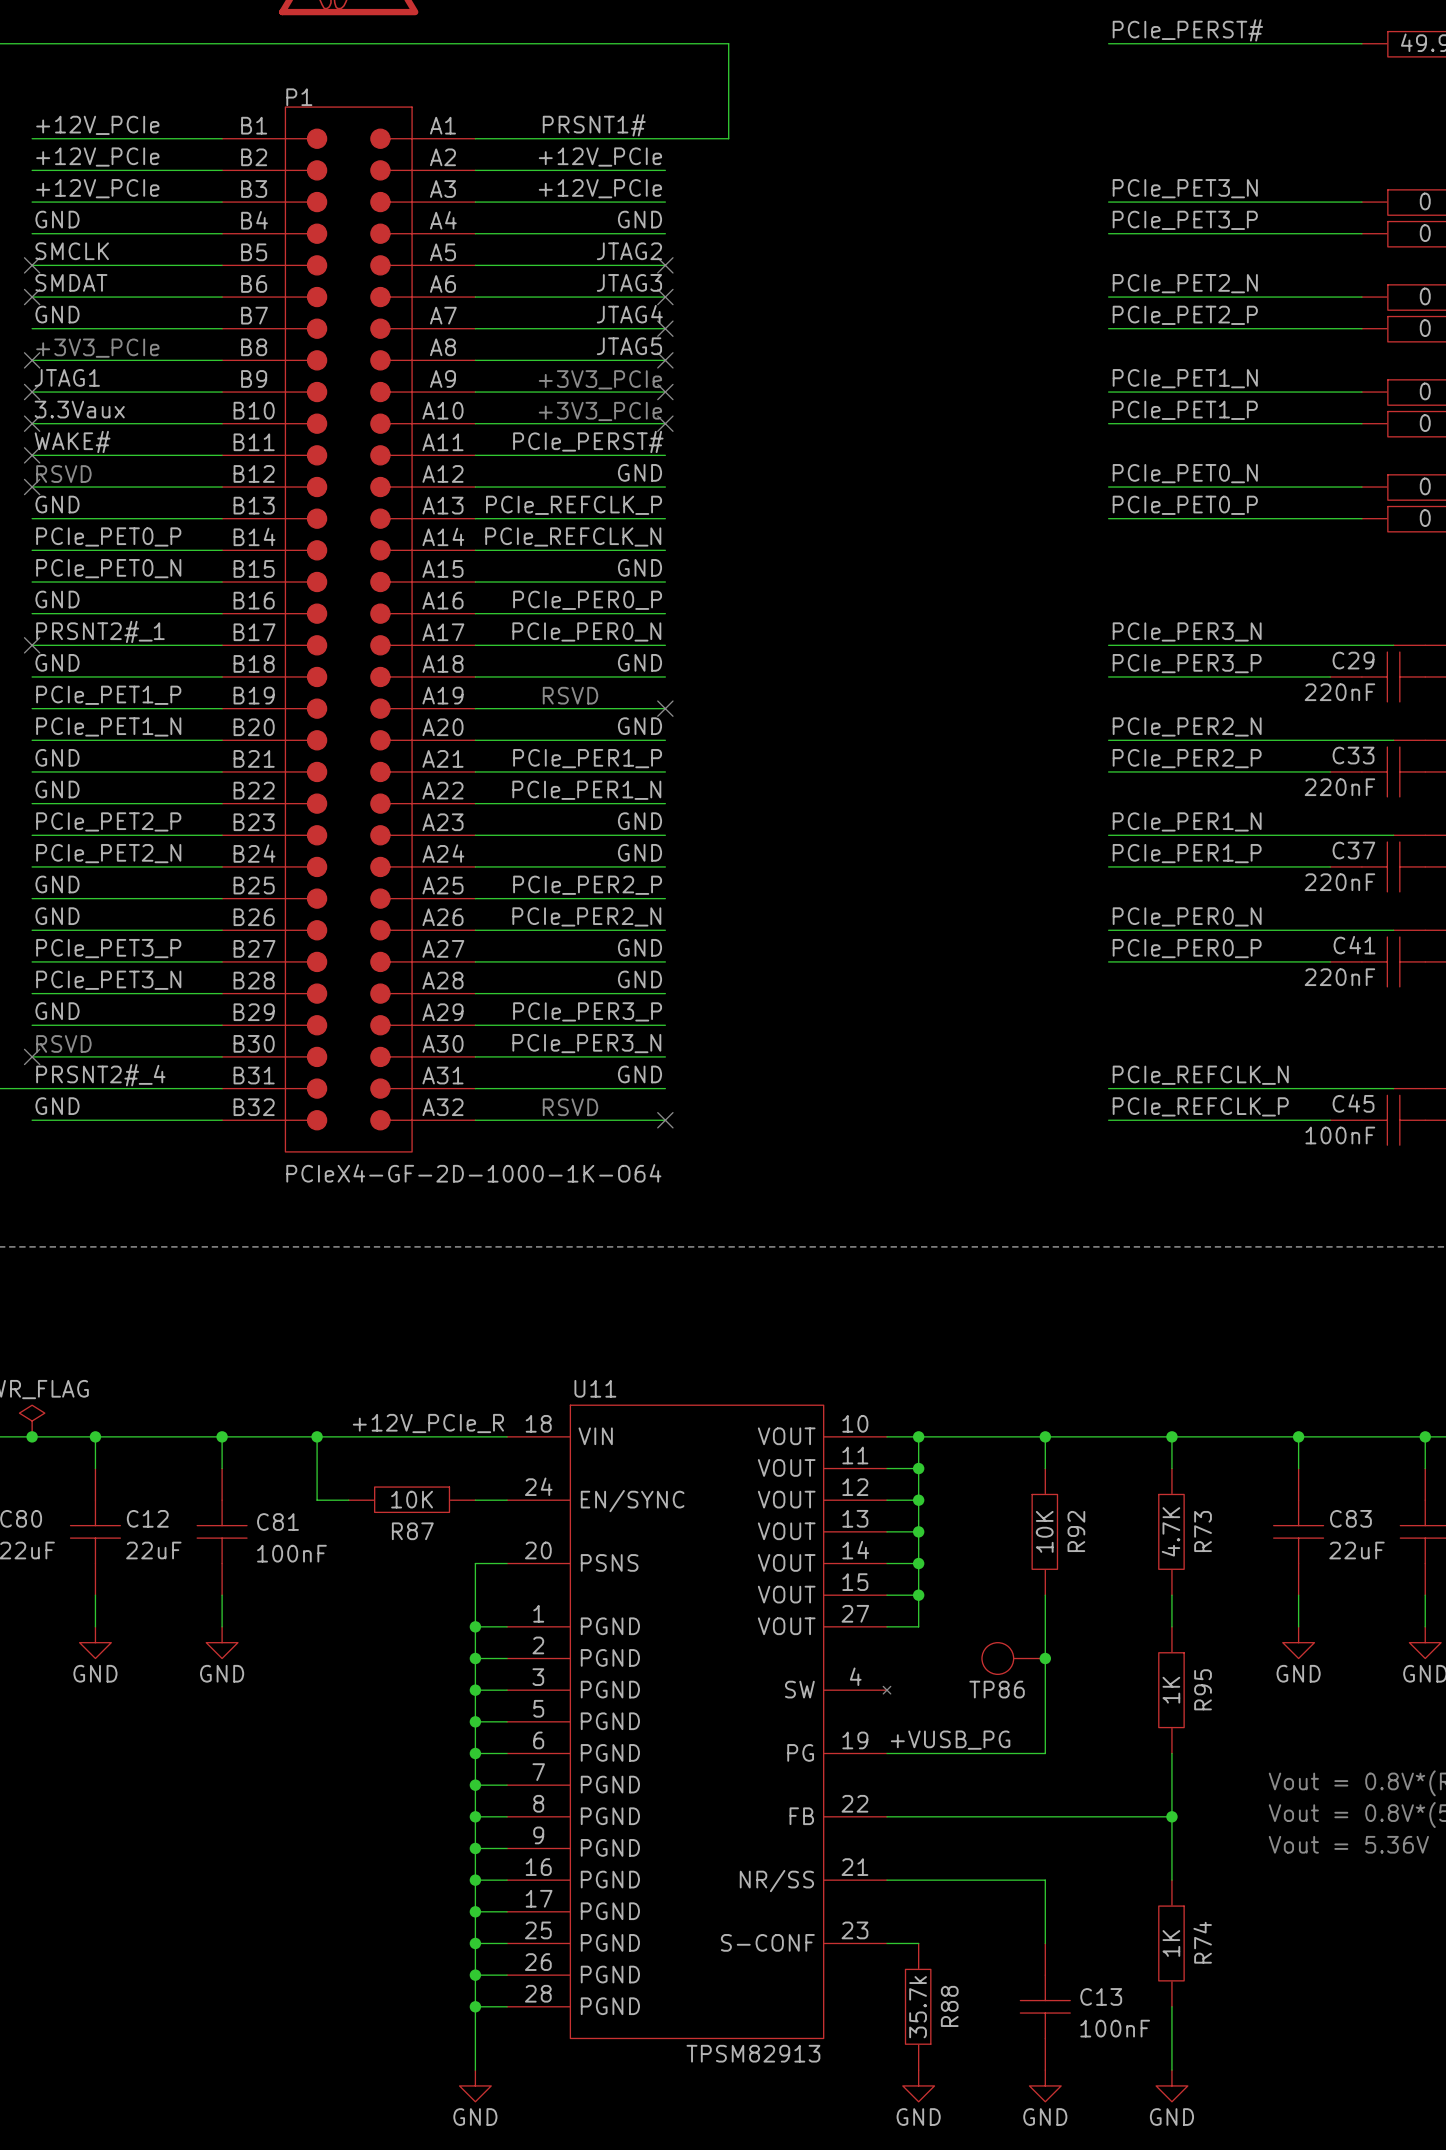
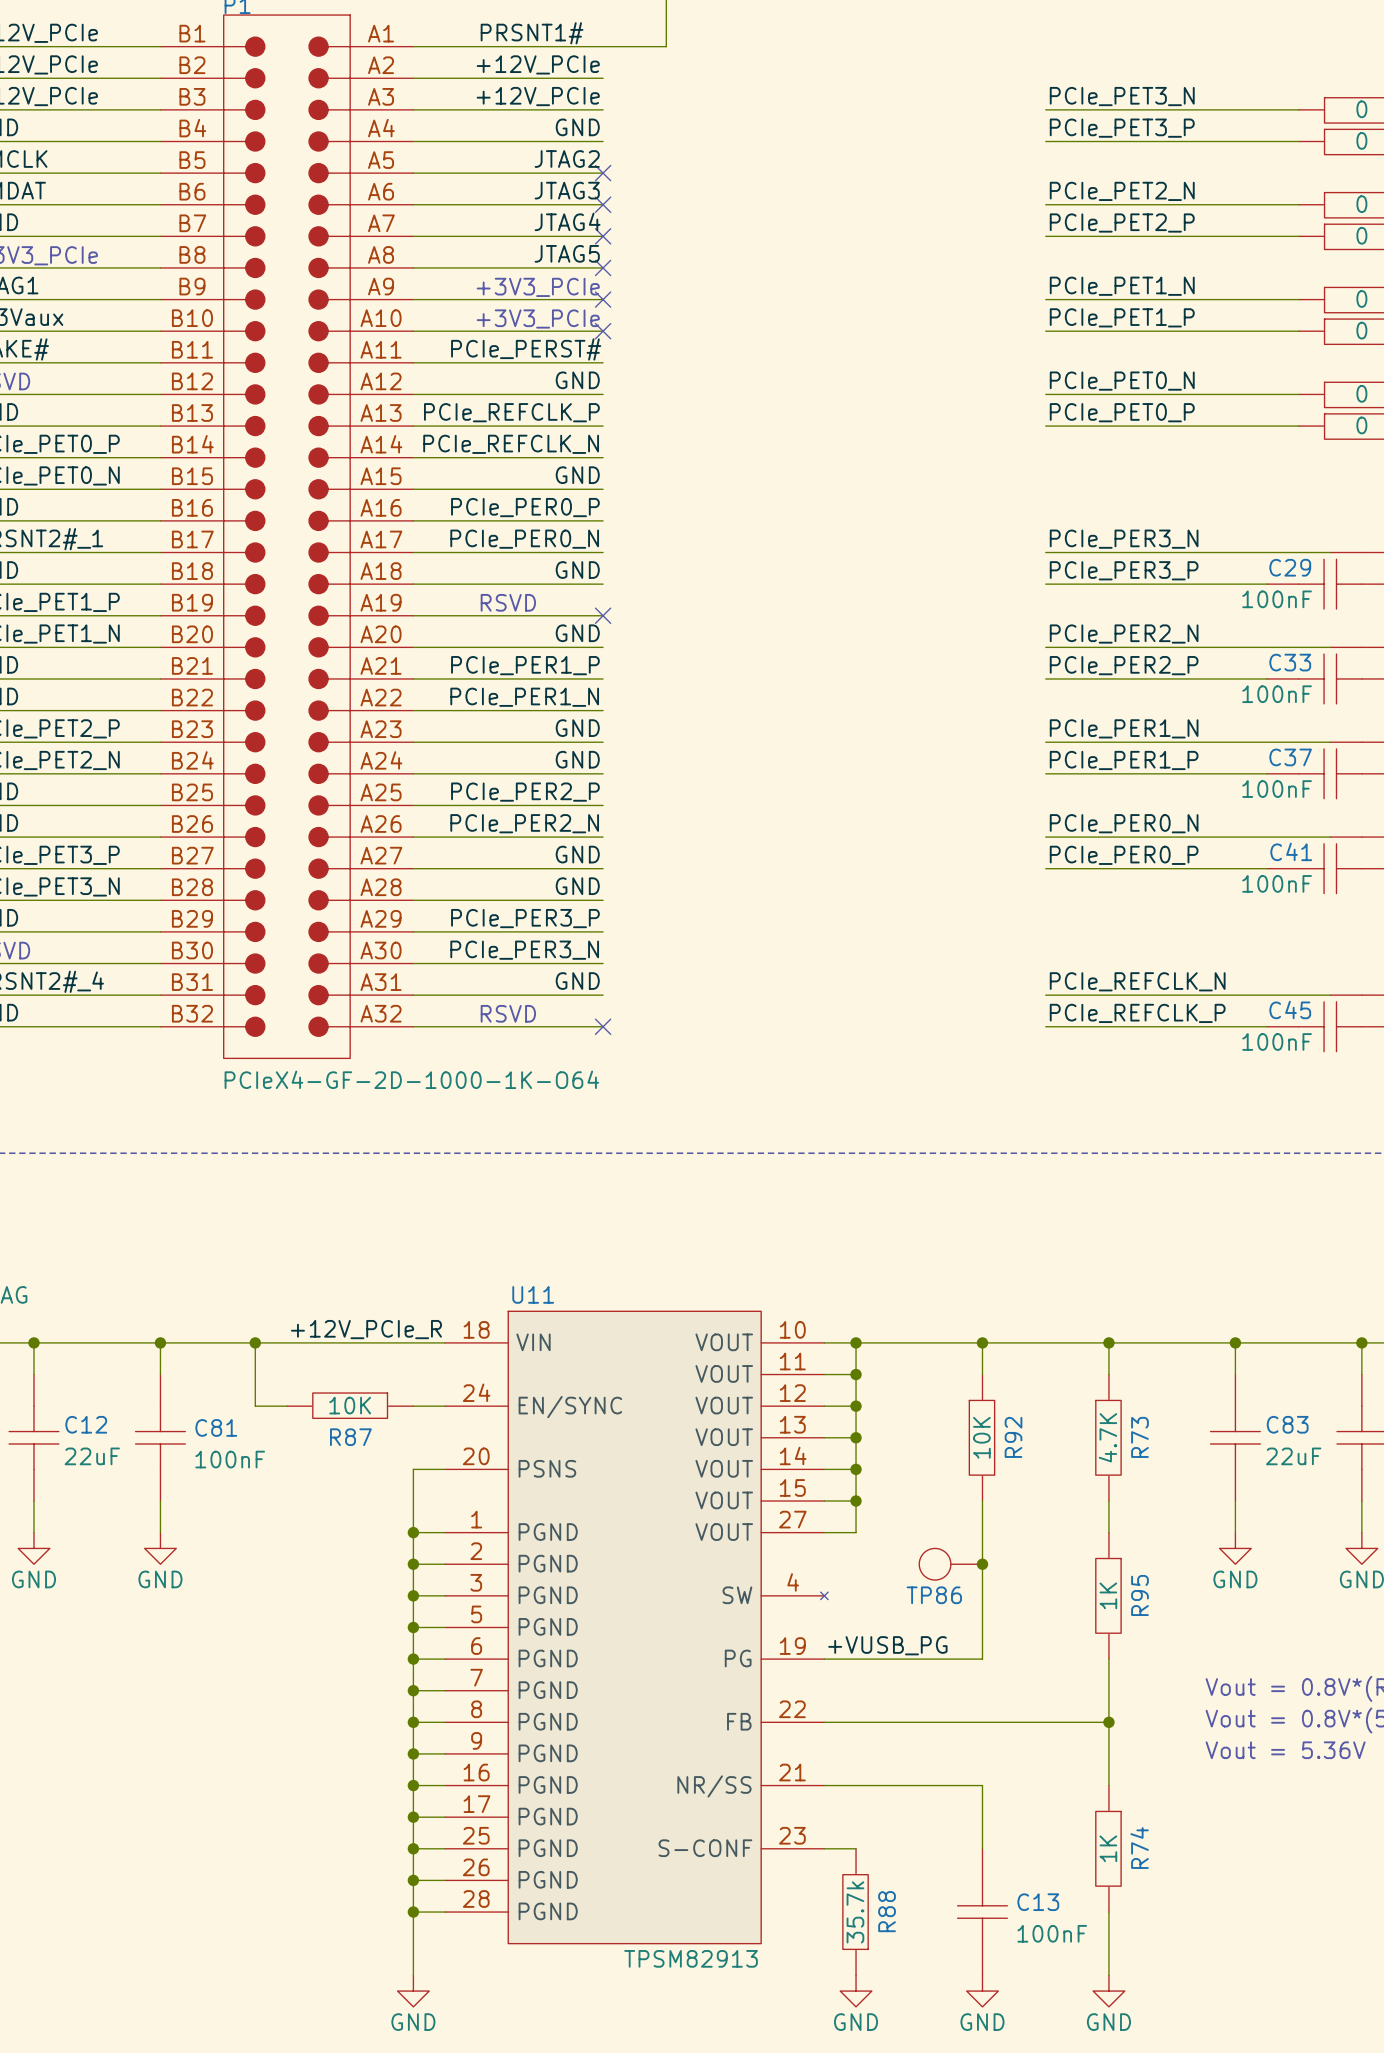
C29 value: 220nF (1339, 692) -> 100nF (1277, 599)
C33 value: 220nF (1339, 787) -> 100nF (1277, 694)
C37 value: 220nF (1339, 882) -> 100nF (1277, 789)
C41 value: 220nF (1339, 977) -> 100nF (1277, 883)

